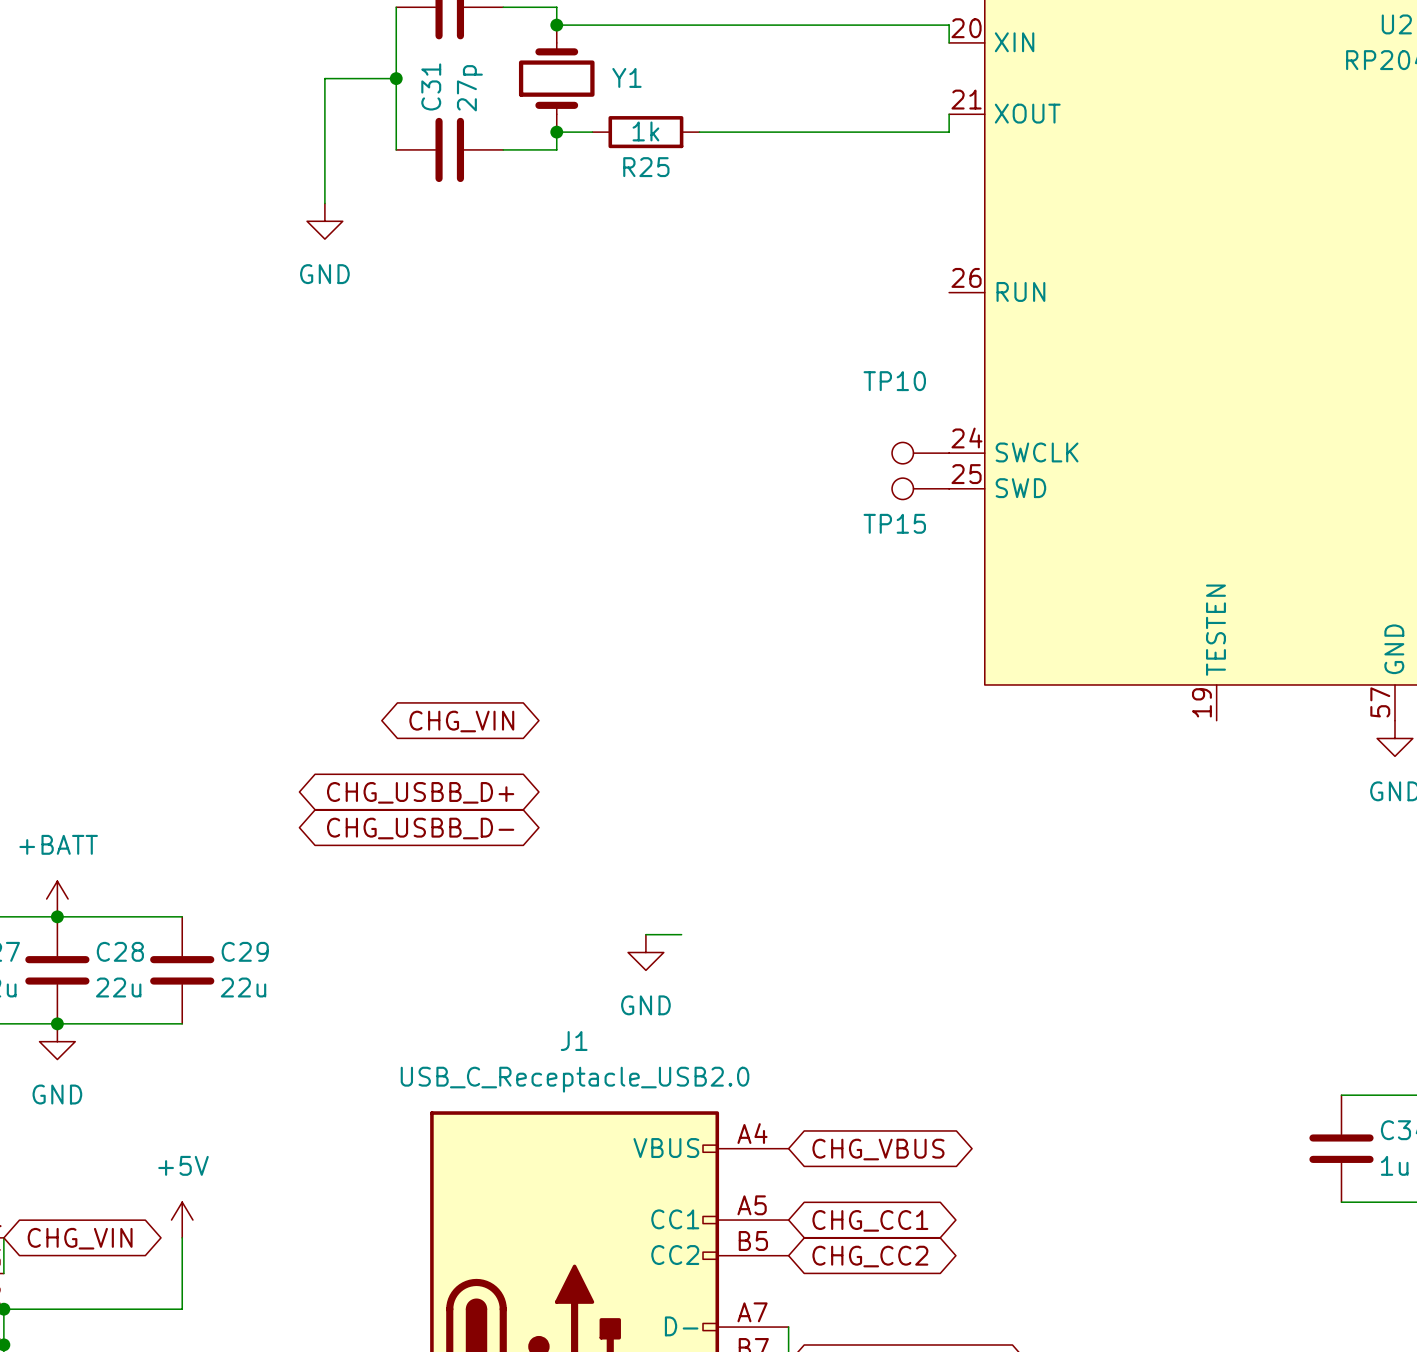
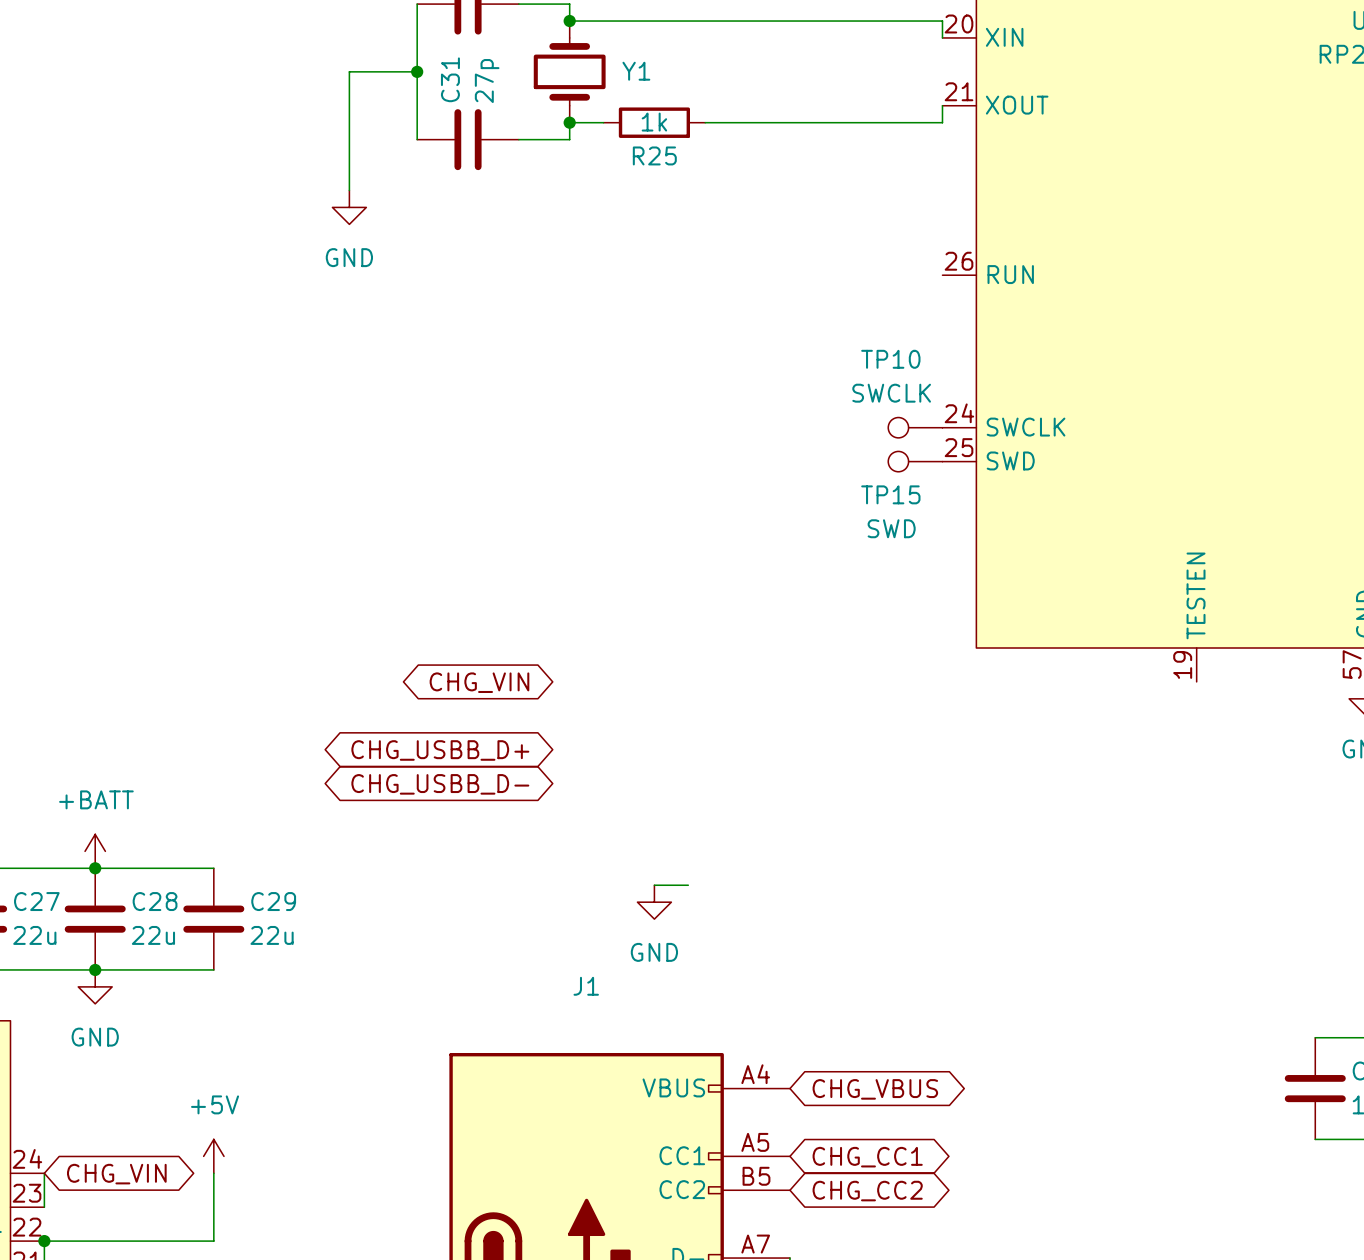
TP10 value: none -> SWCLK (891, 393)
TP15 value: none -> SWD (891, 528)
J1 value: USB_C_Receptacle_USB2.0 (575, 1079) -> none

